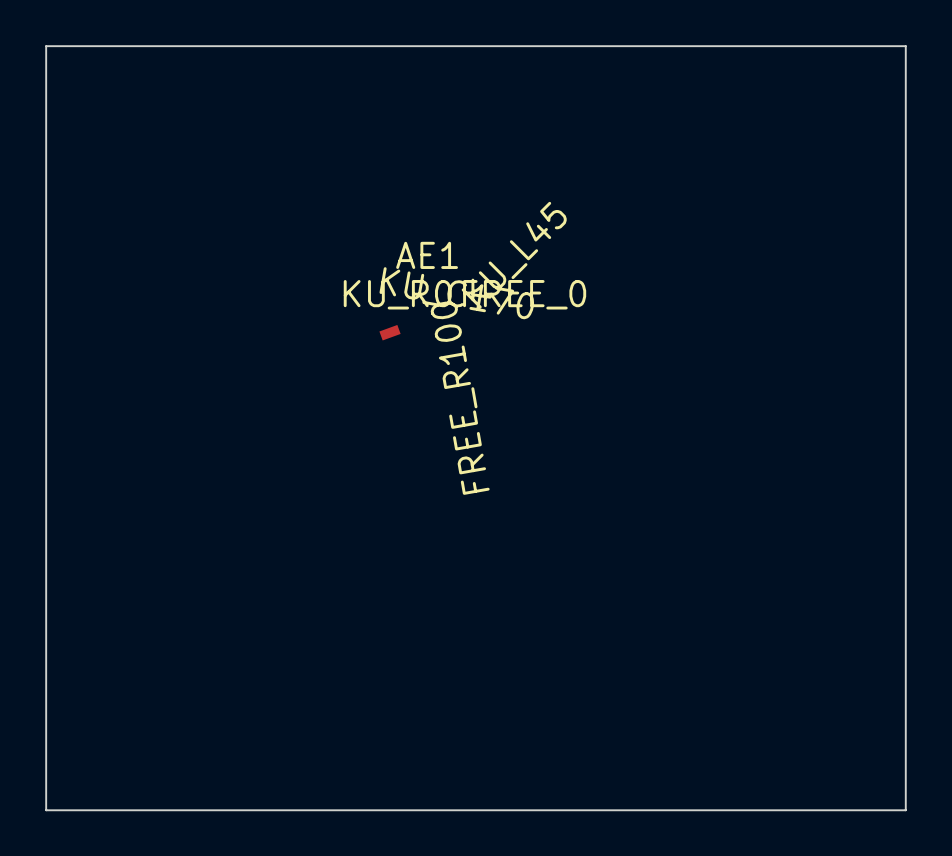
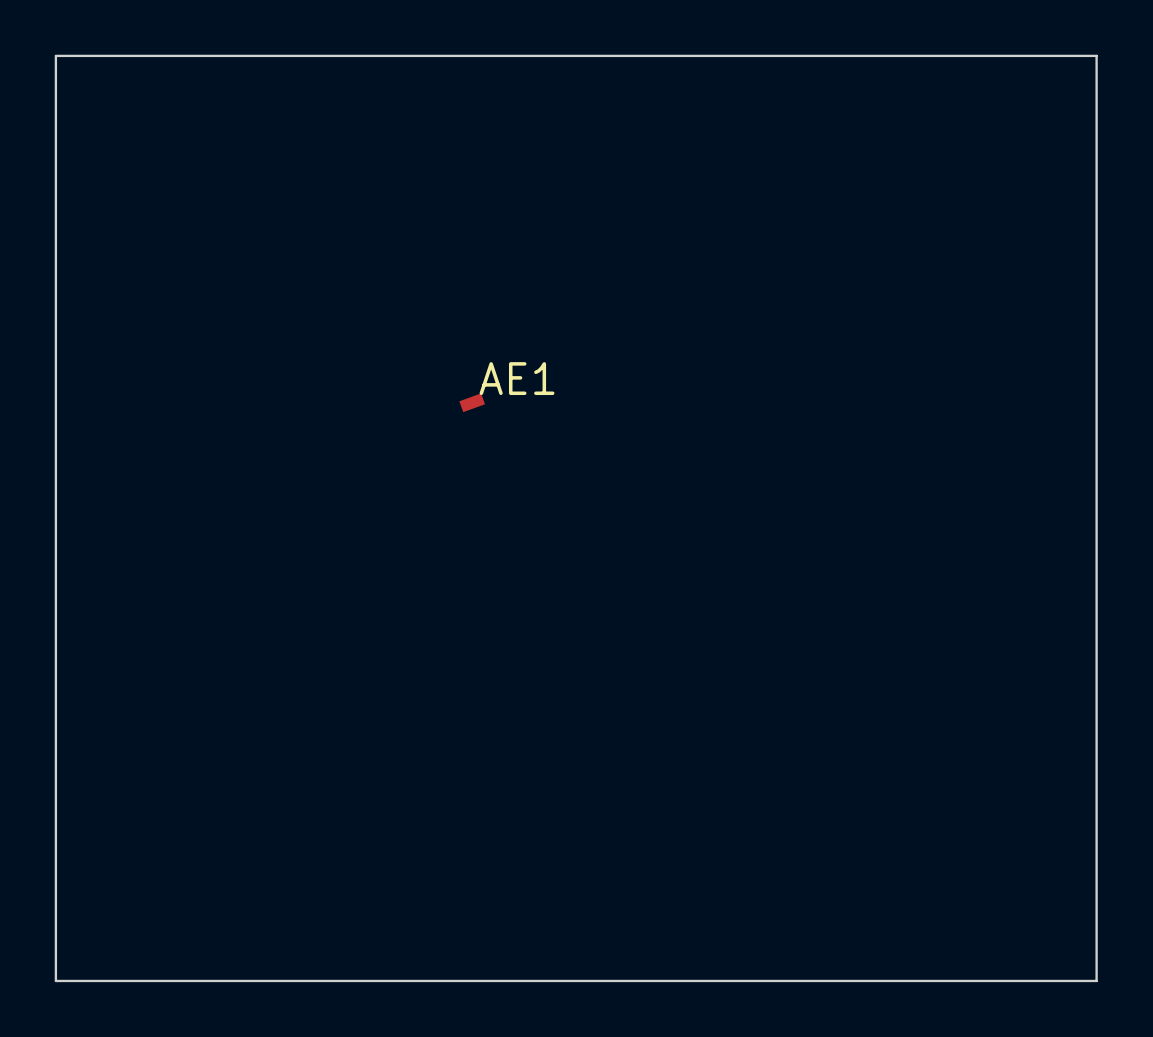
AE1 name position: AE1 (427, 255) -> AE1 (517, 378)
AE1 footprint: [379, 324, 401, 341] -> [459, 393, 486, 413]

